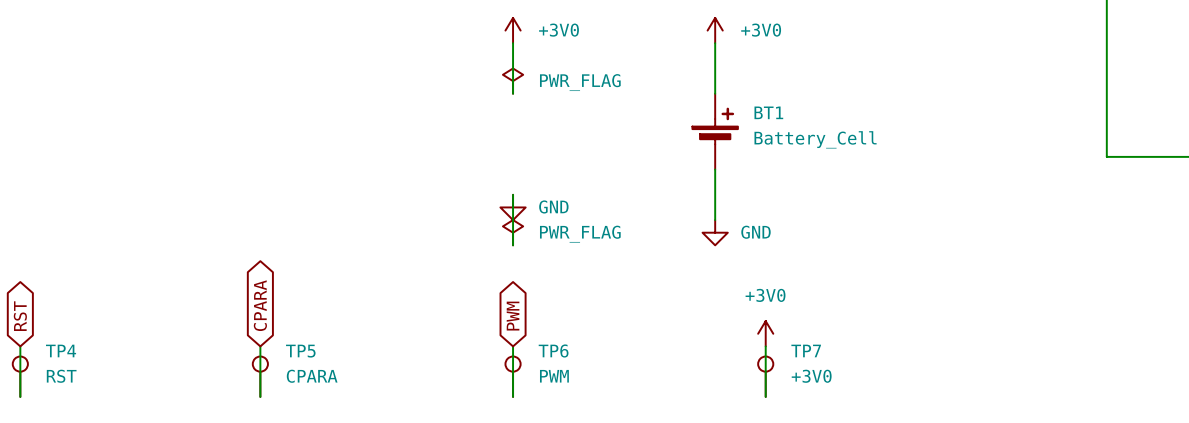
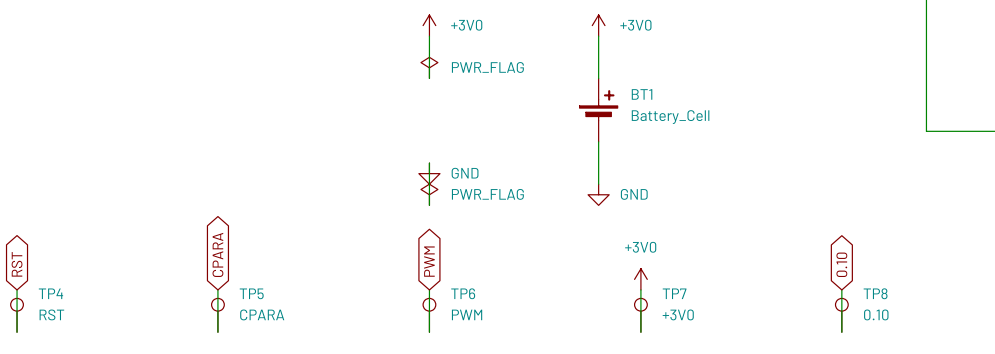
global label: none -> 0.10 (841, 264)
wire: none -> (841, 289) (841, 332)
TP8: none -> 0.10 (841, 315)

